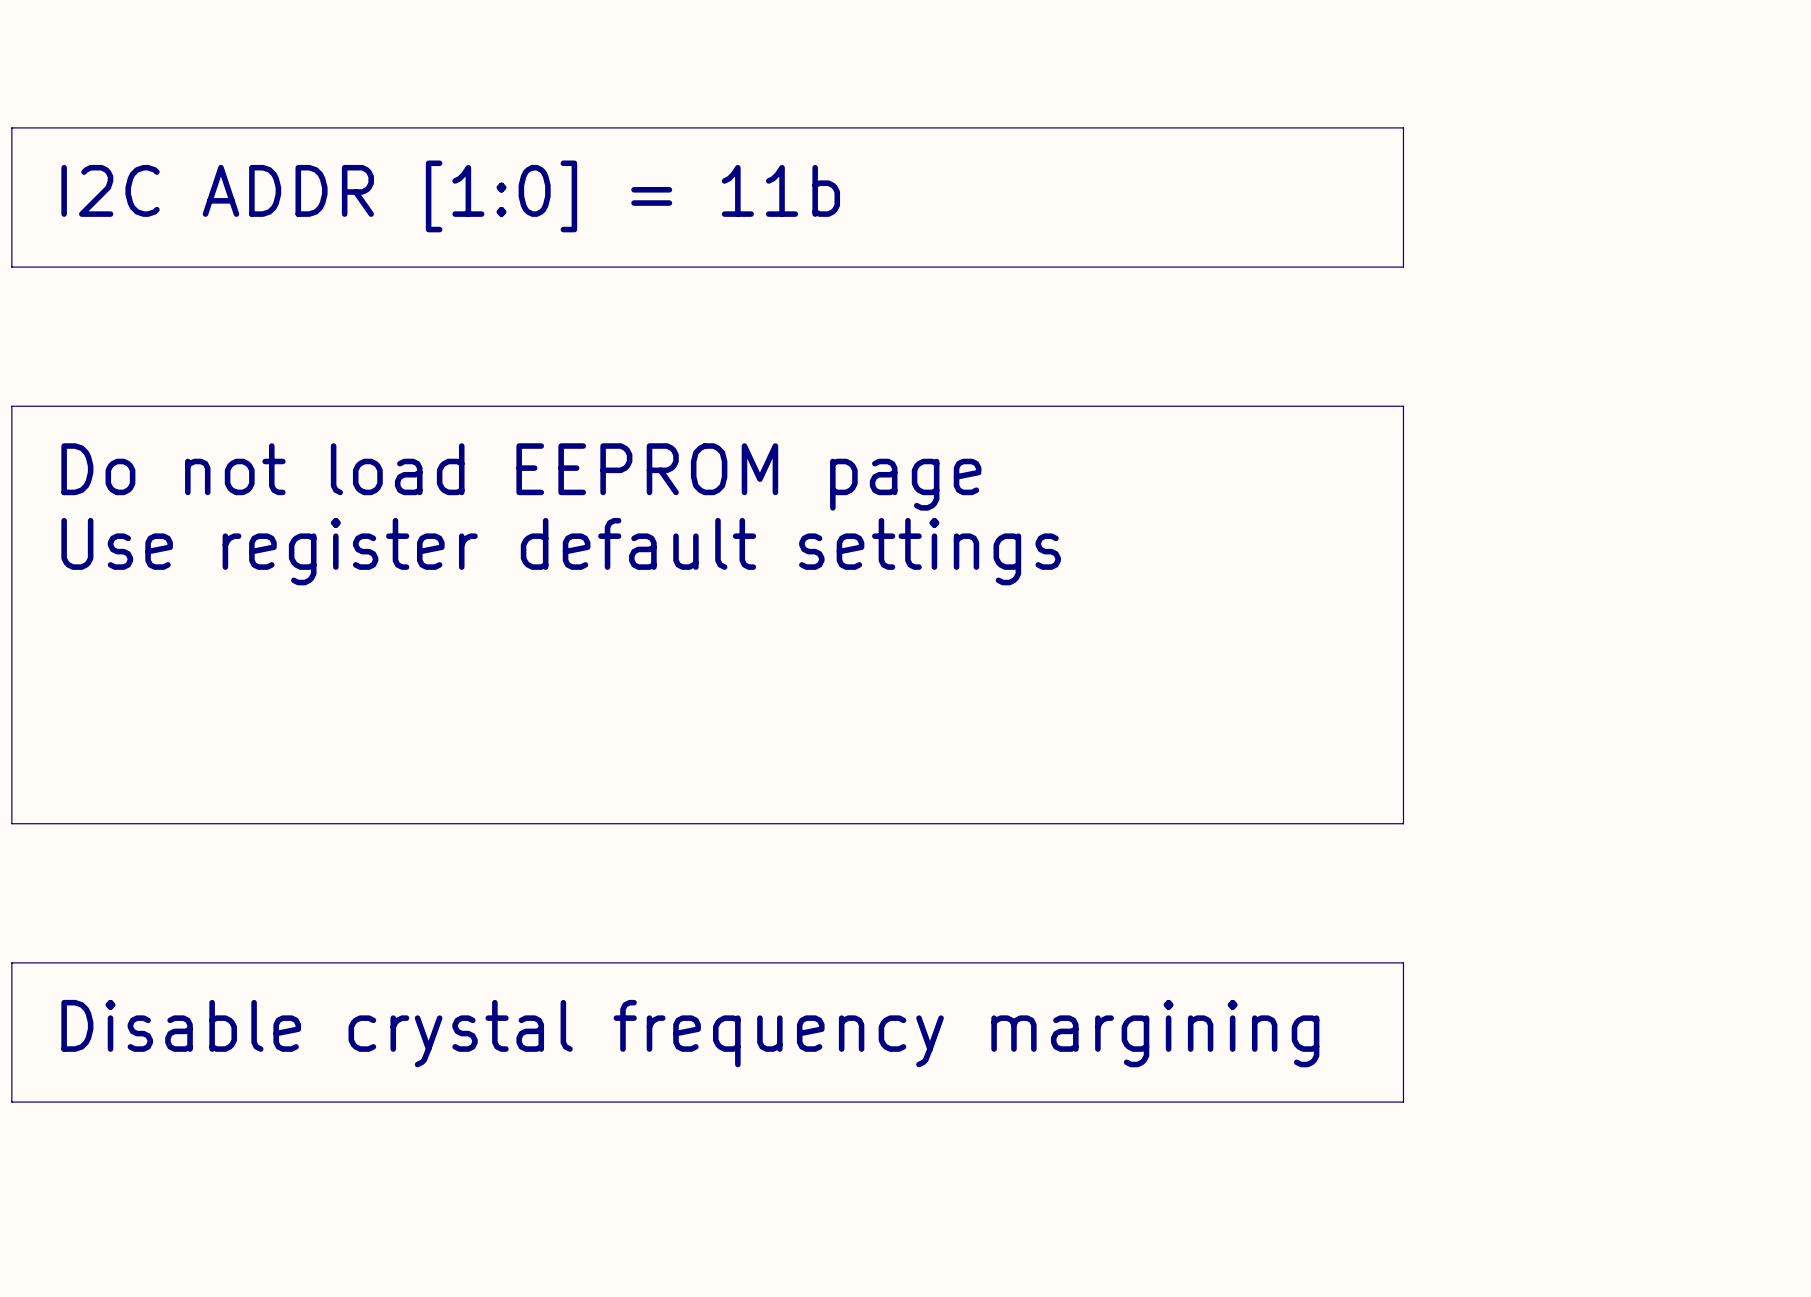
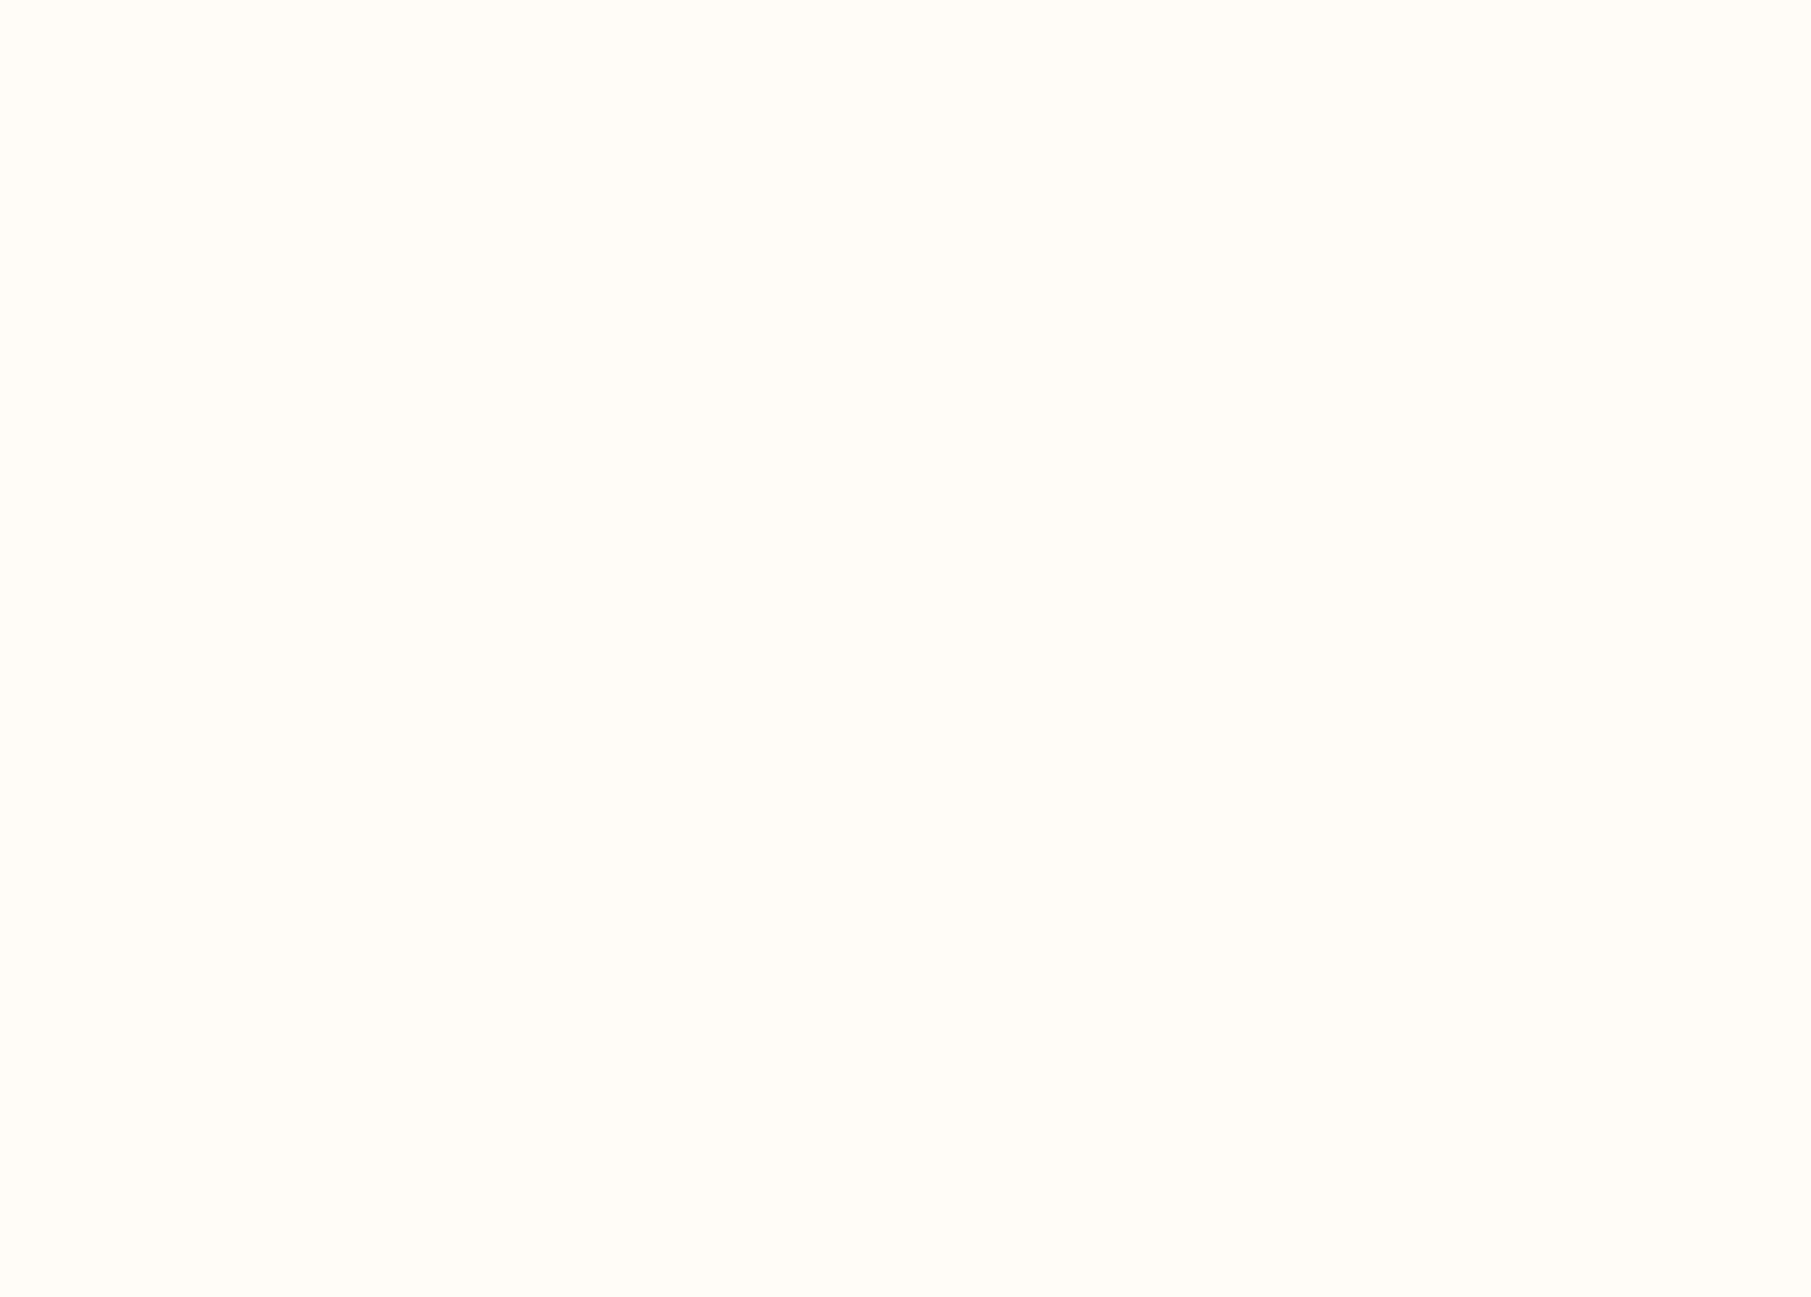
line: (11, 127) (1403, 127) (1403, 267) (11, 267) (11, 127) -> none
text: I2C ADDR [1:0] = 11b (450, 196) -> none
line: (11, 406) (11, 823) (1403, 823) (1403, 406) (11, 406) -> none
text: Do not load EEPROM page (521, 476) -> none
text: Use register default settings (561, 551) -> none
line: (11, 962) (11, 1102) (1403, 1102) (1403, 962) (11, 962) -> none
text: Disable crystal frequency margining (690, 1033) -> none

